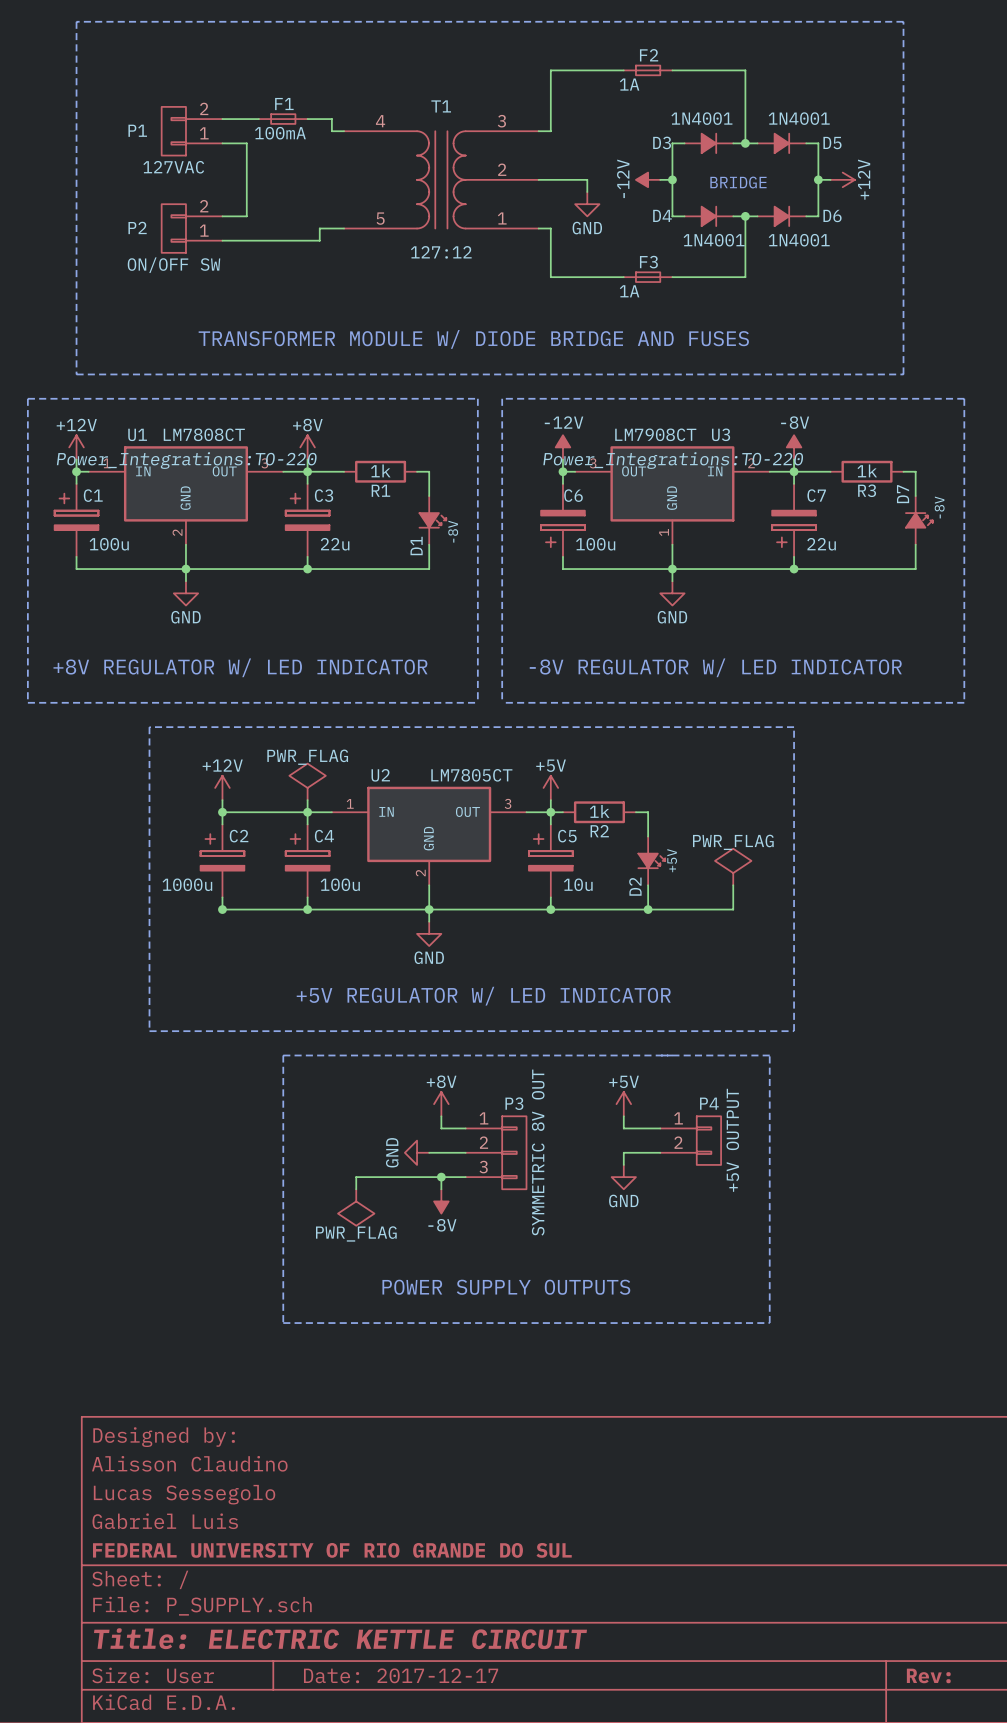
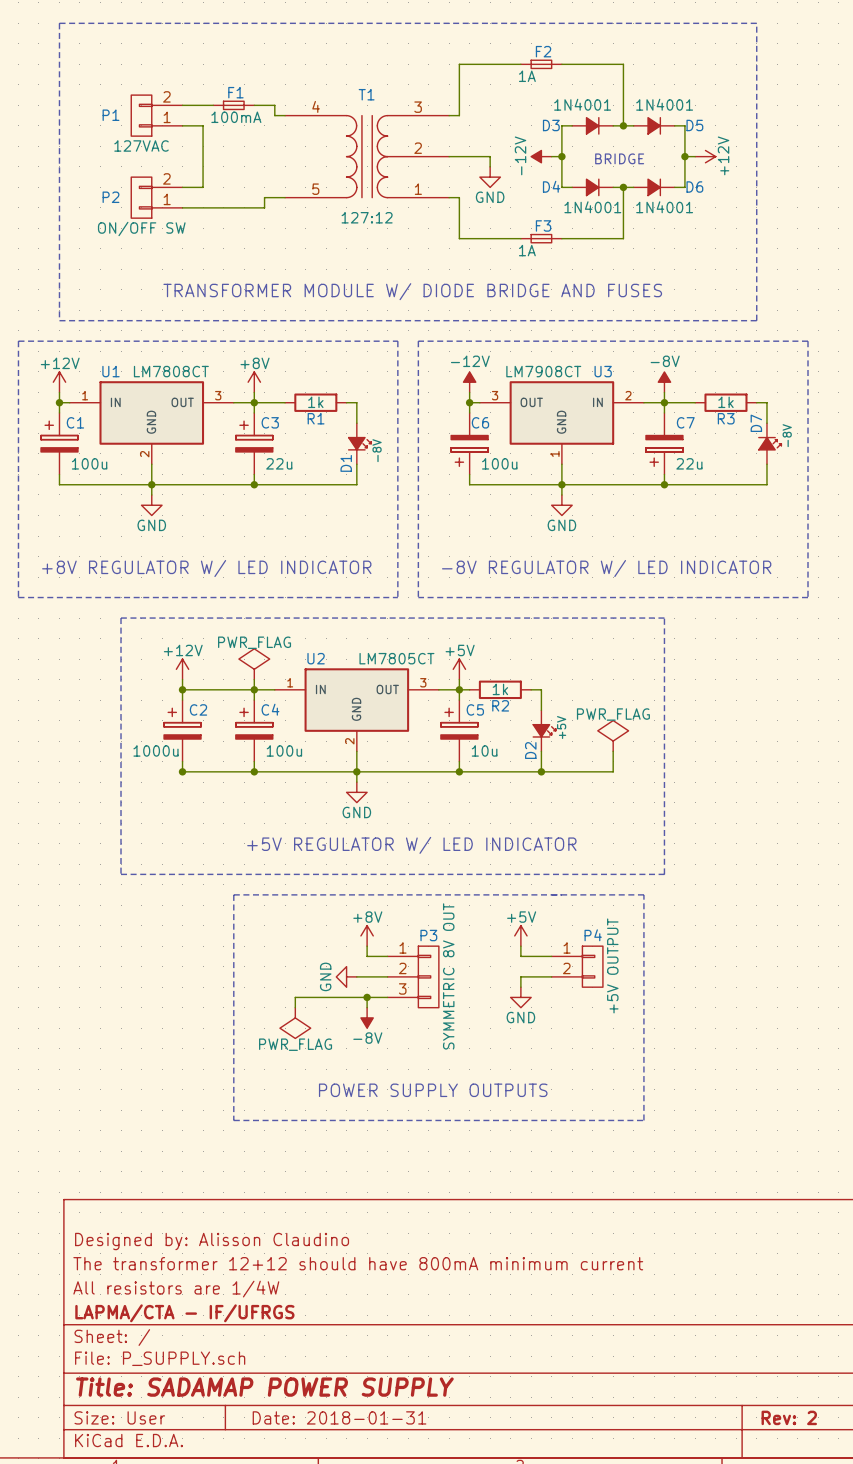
U1 text: Power_Integrations:TO-220 (186, 460) -> none
U3 text: Power_Integrations:TO-220 (673, 460) -> none
title block: Designed by: (164, 1437) -> none
title block: Alisson Claudino (189, 1463) -> Designed by: Alisson Claudino (212, 1241)
title block: Lucas Sessegolo (184, 1494) -> The transformer 12+12 should have 800mA minimum current (358, 1263)
title block: Gabriel Luis (165, 1521) -> All resistors are 1/4W (176, 1289)
title block: FEDERAL UNIVERSITY OF RIO GRANDE DO SUL (332, 1550) -> LAPMA/CTA - IF/UFRGS (184, 1313)
title block: Title: ELECTRIC KETTLE CIRCUIT (340, 1638) -> Title: SADAMAP POWER SUPPLY (264, 1387)
title block: Date: 2017-12-17 (401, 1675) -> Date: 2018-01-31 (339, 1417)
title block: Rev: (928, 1675) -> Rev: 2 (789, 1417)

